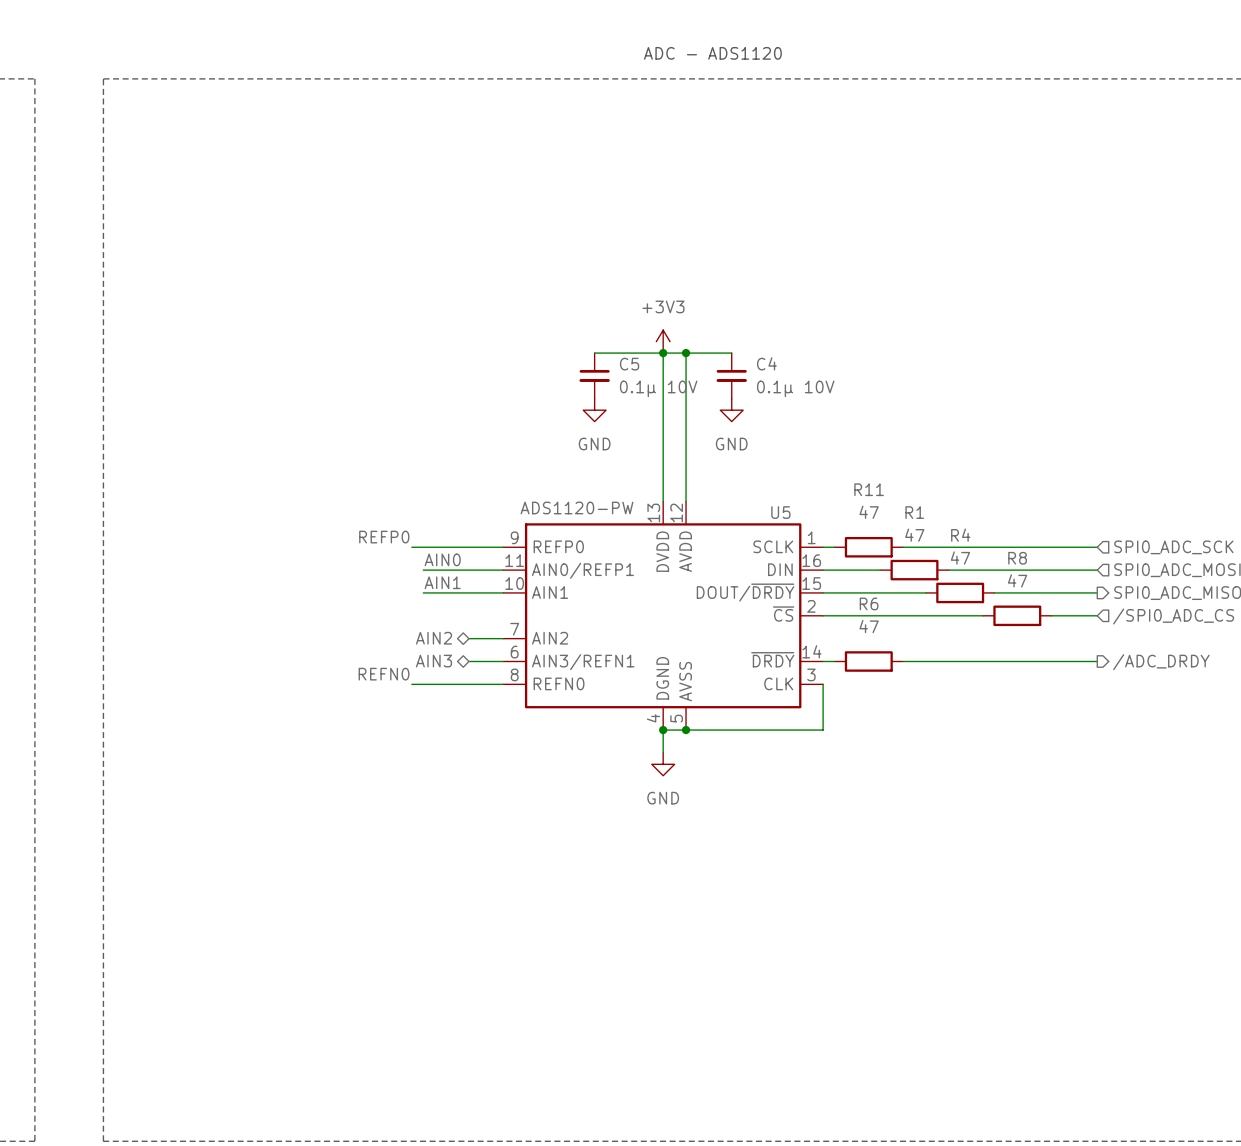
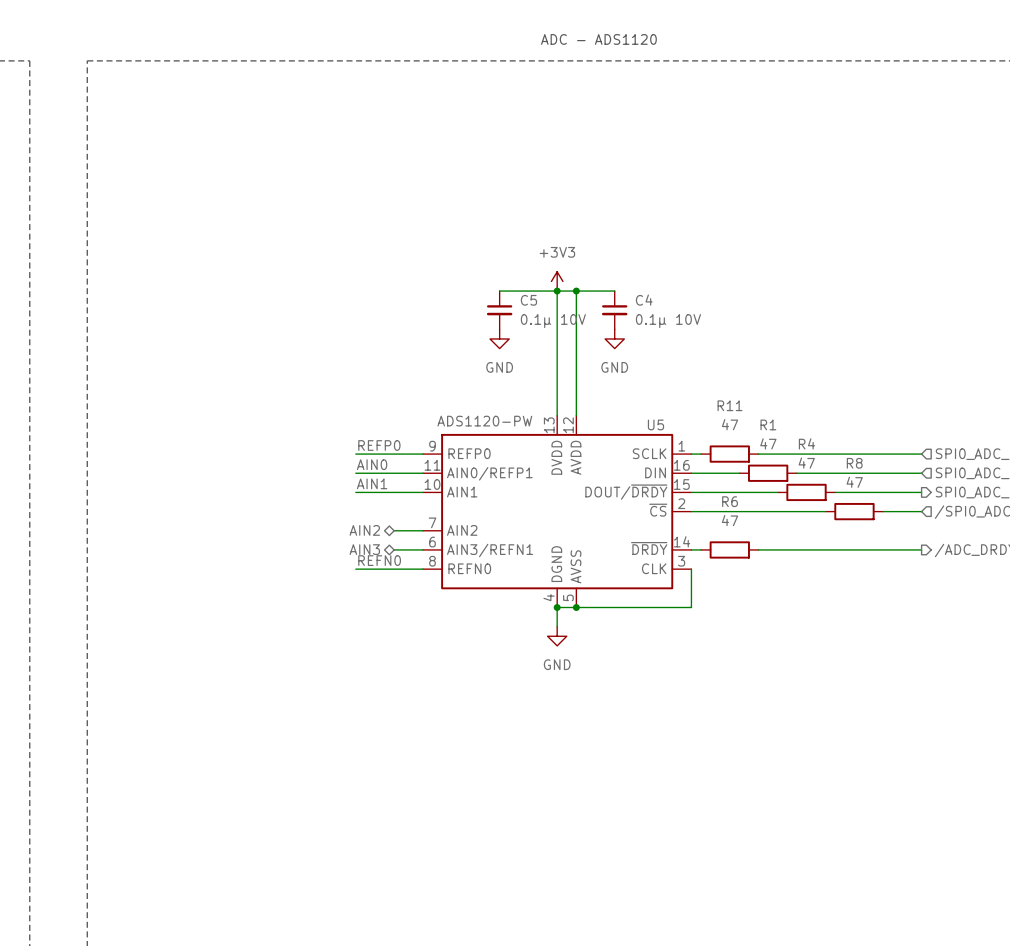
label position: REFP0 (384, 537) -> REFP0 (379, 445)
wire: (411, 547) (423, 547) -> none
label position: REFN0 (384, 674) -> REFN0 (379, 560)
wire: (411, 684) (423, 684) -> none

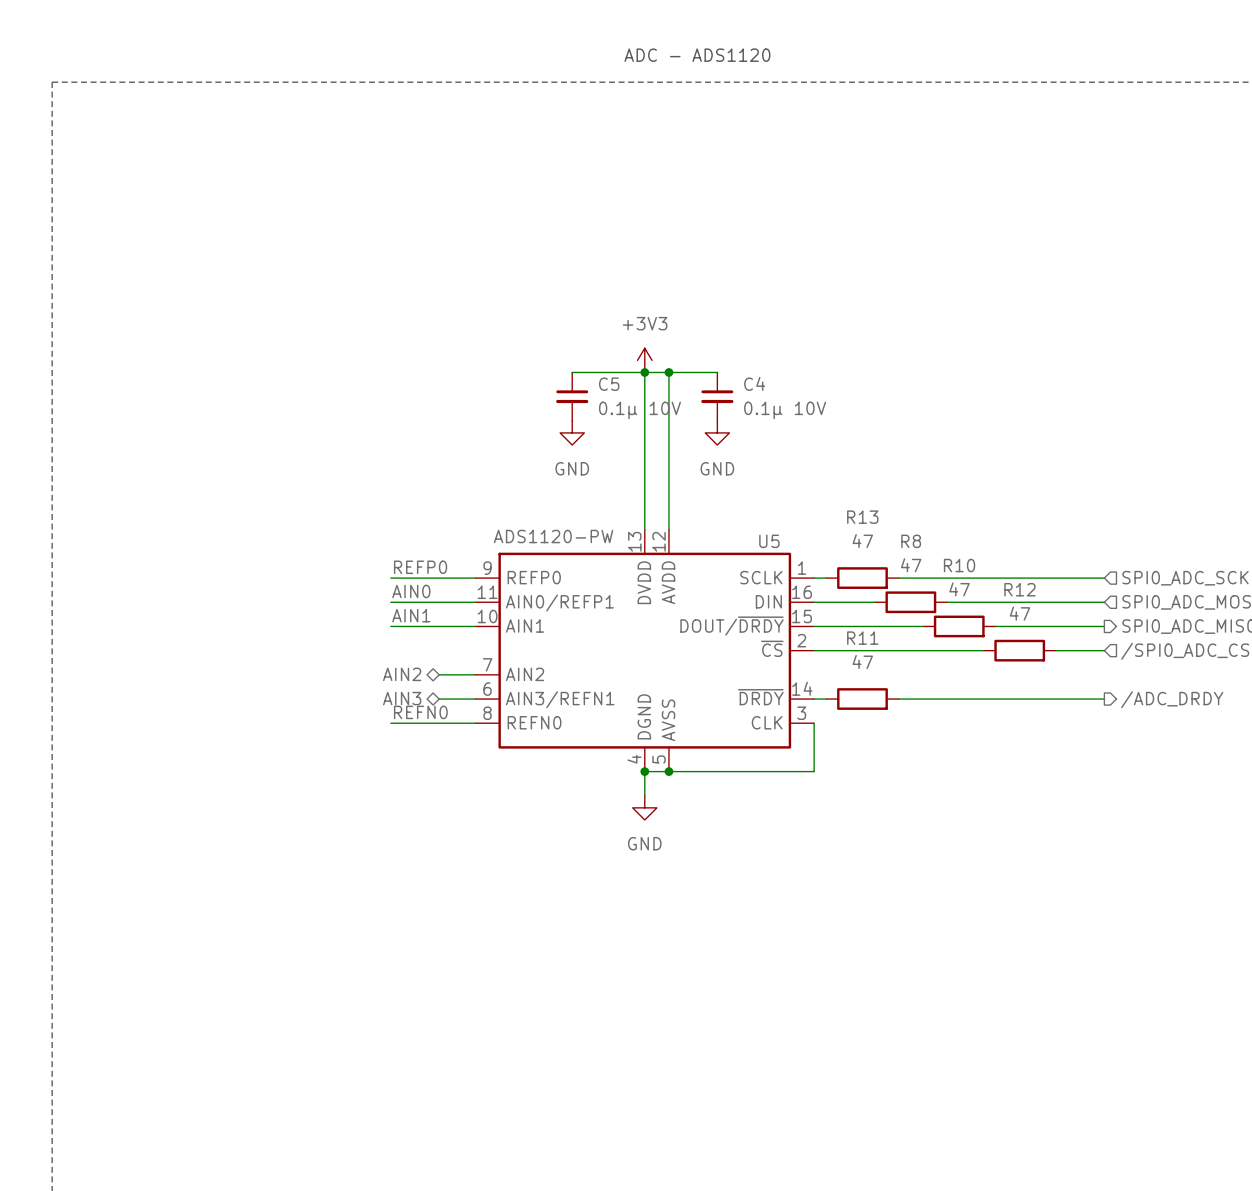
R11 name: R11 (730, 405) -> R13 (862, 517)
R1 name: R1 (768, 424) -> R8 (911, 541)
R4 name: R4 (806, 443) -> R10 (959, 565)
R8 name: R8 (854, 463) -> R12 (1020, 589)
R6 name: R6 (730, 501) -> R11 (862, 638)

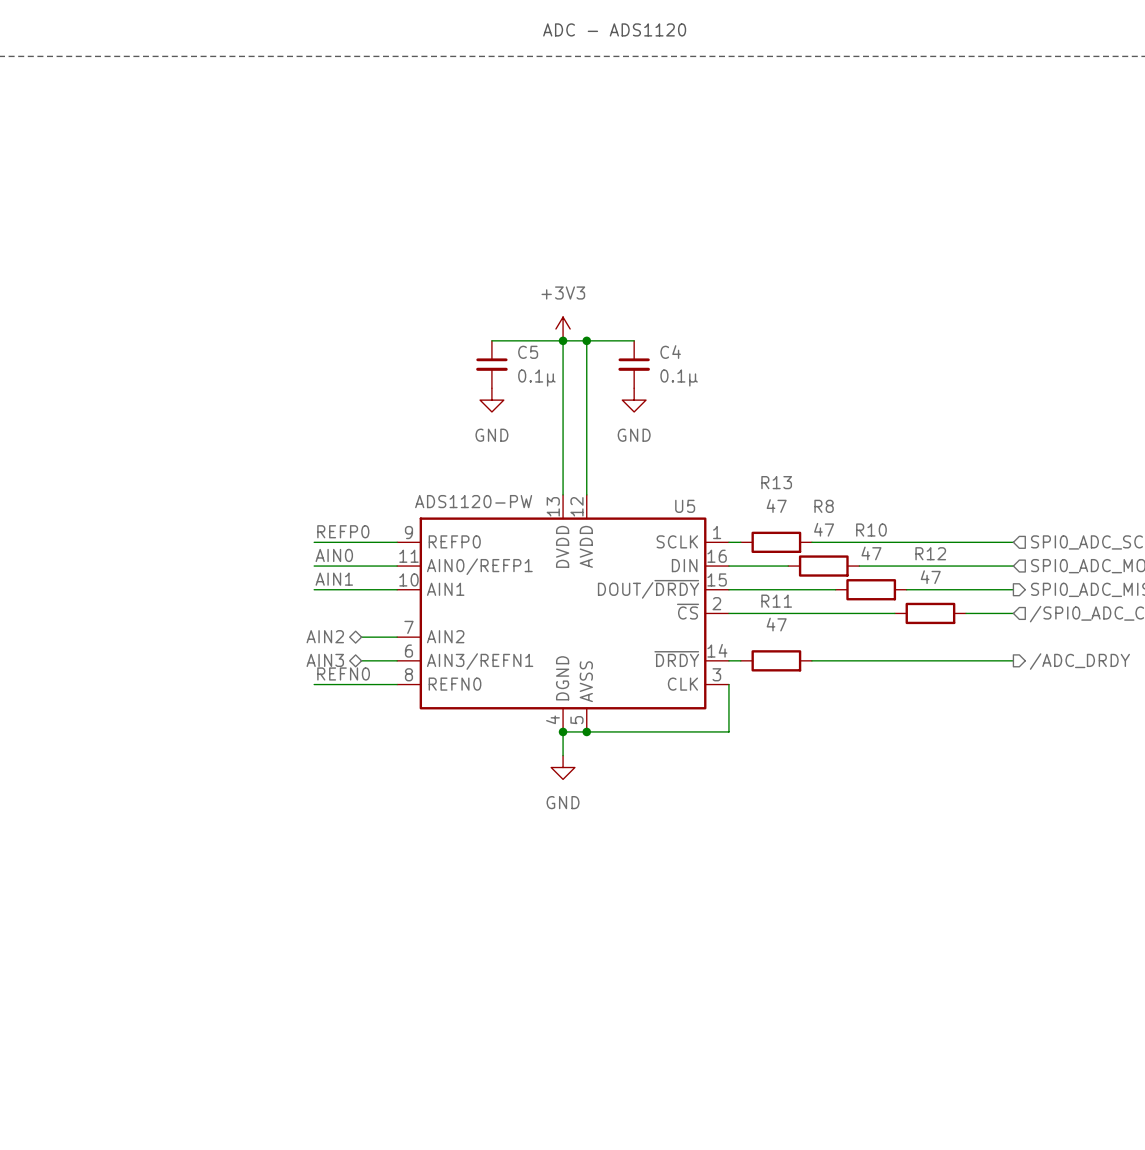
C5 value: 0.1µ 10V (639, 410) -> 0.1µ (536, 377)
C4 value: 0.1µ 10V (785, 410) -> 0.1µ (679, 377)

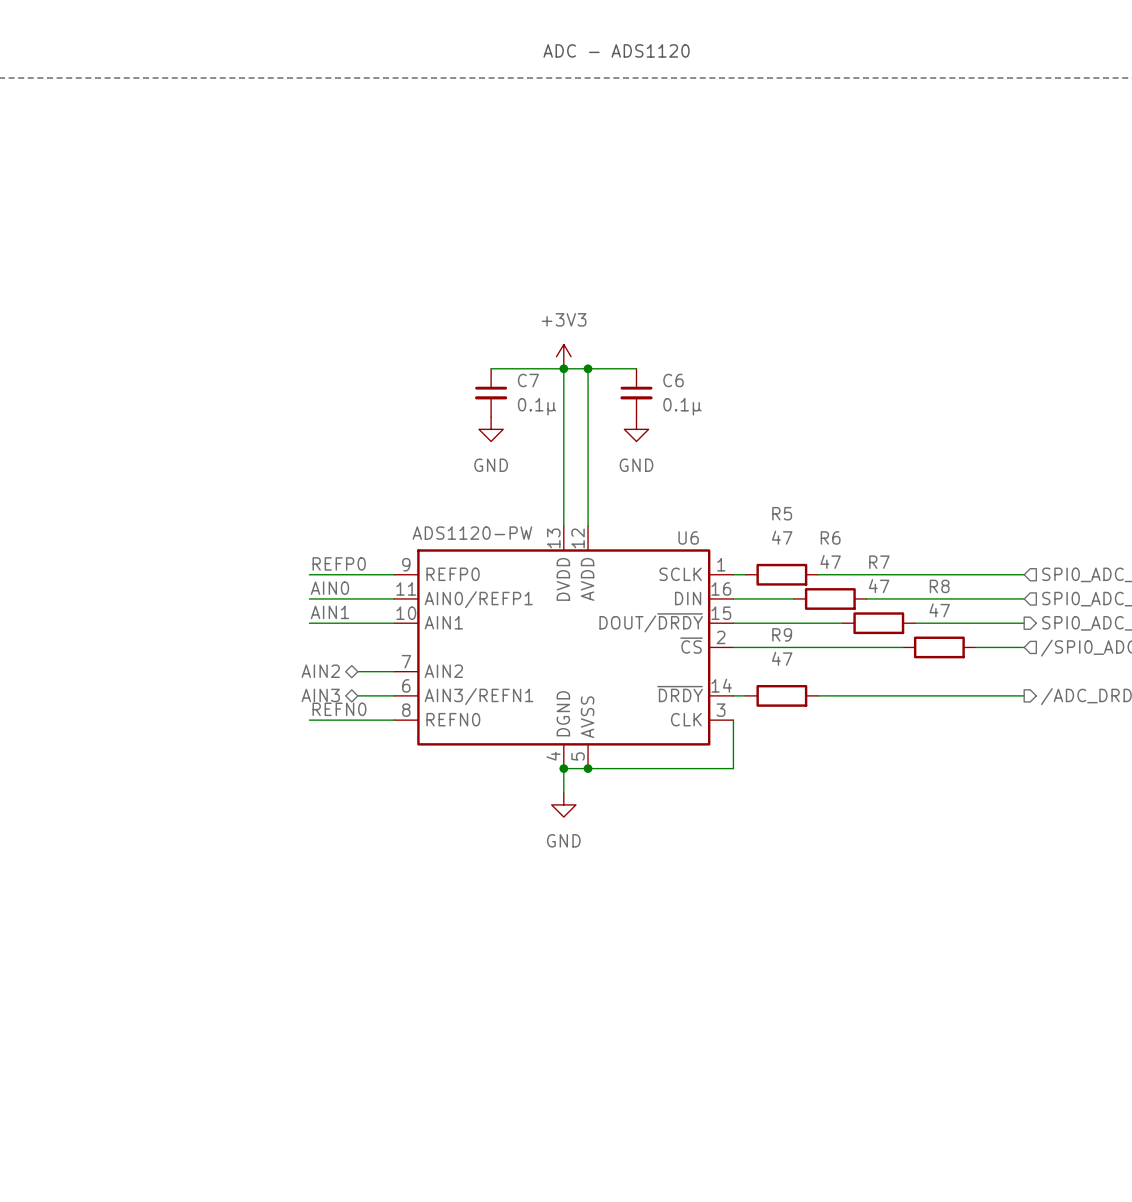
C5 name: C5 (528, 352) -> C7 (528, 380)
C4 name: C4 (670, 352) -> C6 (673, 380)
R13 name: R13 (776, 482) -> R5 (782, 513)
U5 name: U5 (685, 506) -> U6 (688, 537)
R8 name: R8 (824, 506) -> R6 (830, 537)
R10 name: R10 (871, 530) -> R7 (879, 562)
R12 name: R12 (930, 553) -> R8 (939, 586)
R11 name: R11 (776, 601) -> R9 (782, 634)

